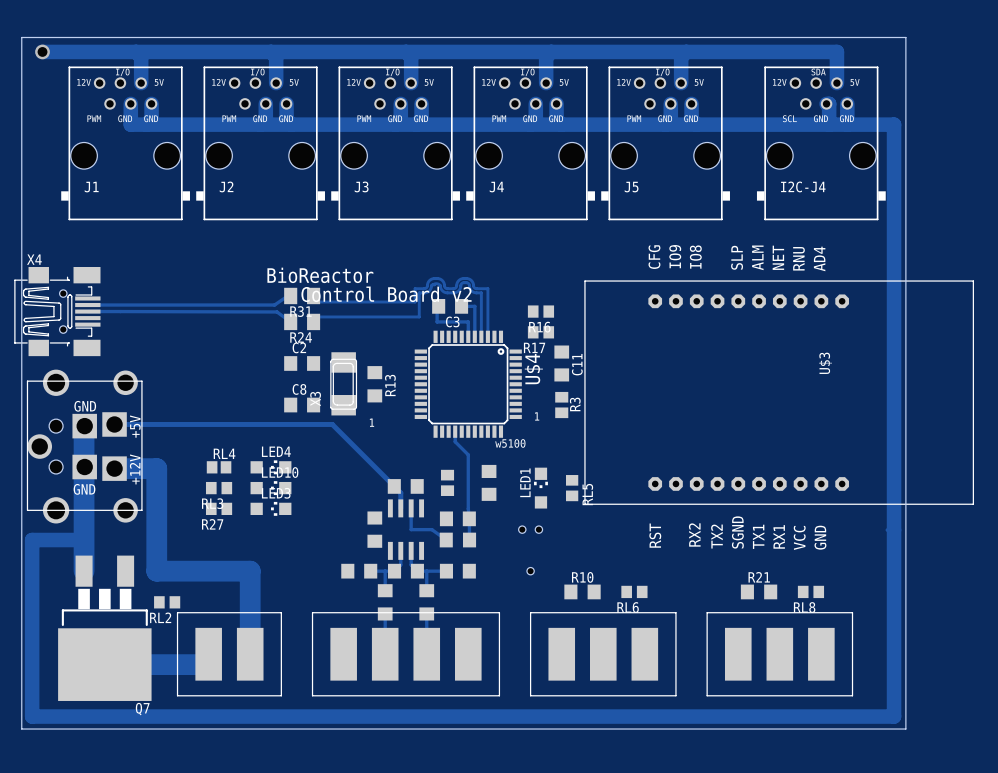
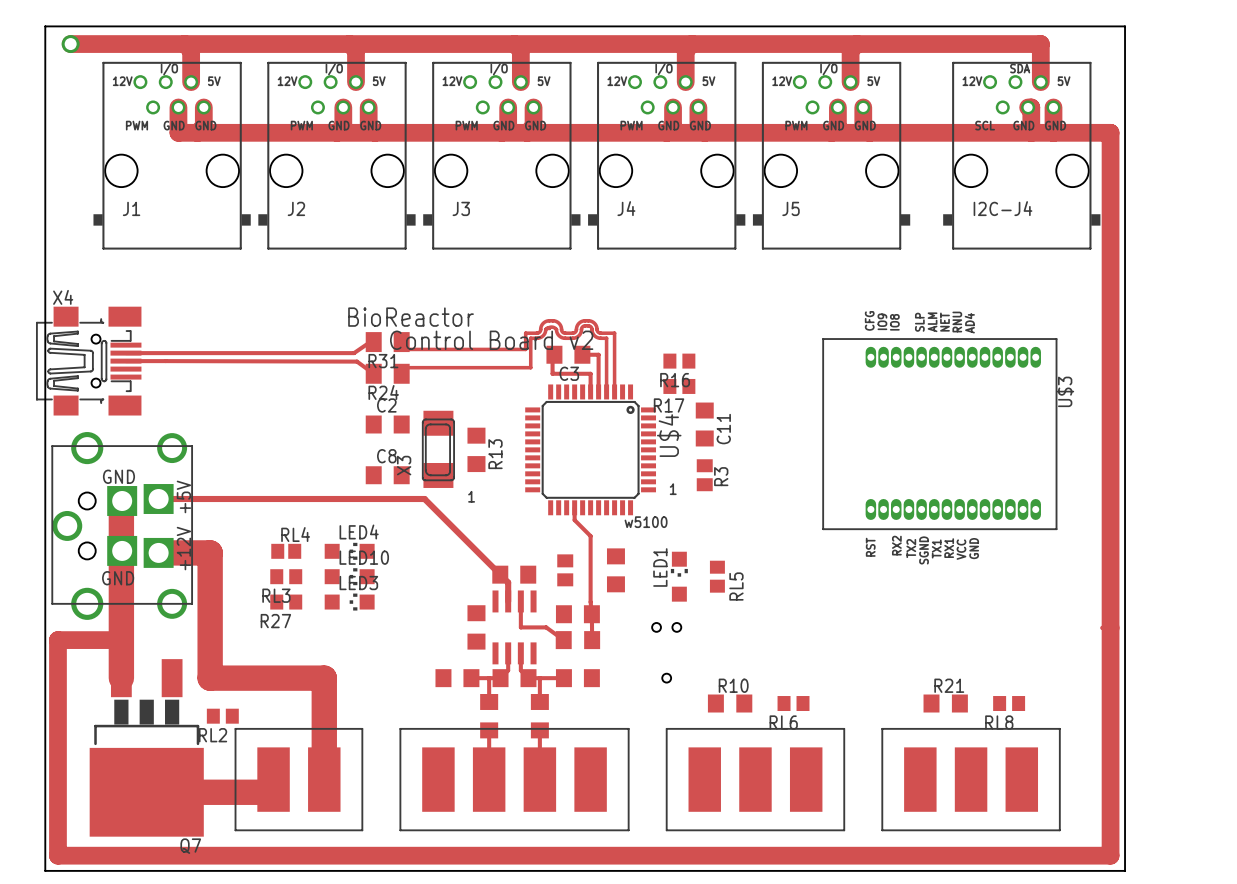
U$3 footprint: [584, 280, 974, 505] -> [822, 338, 1058, 530]
U$3 name position: U$3 (825, 363) -> U$3 (1065, 391)

